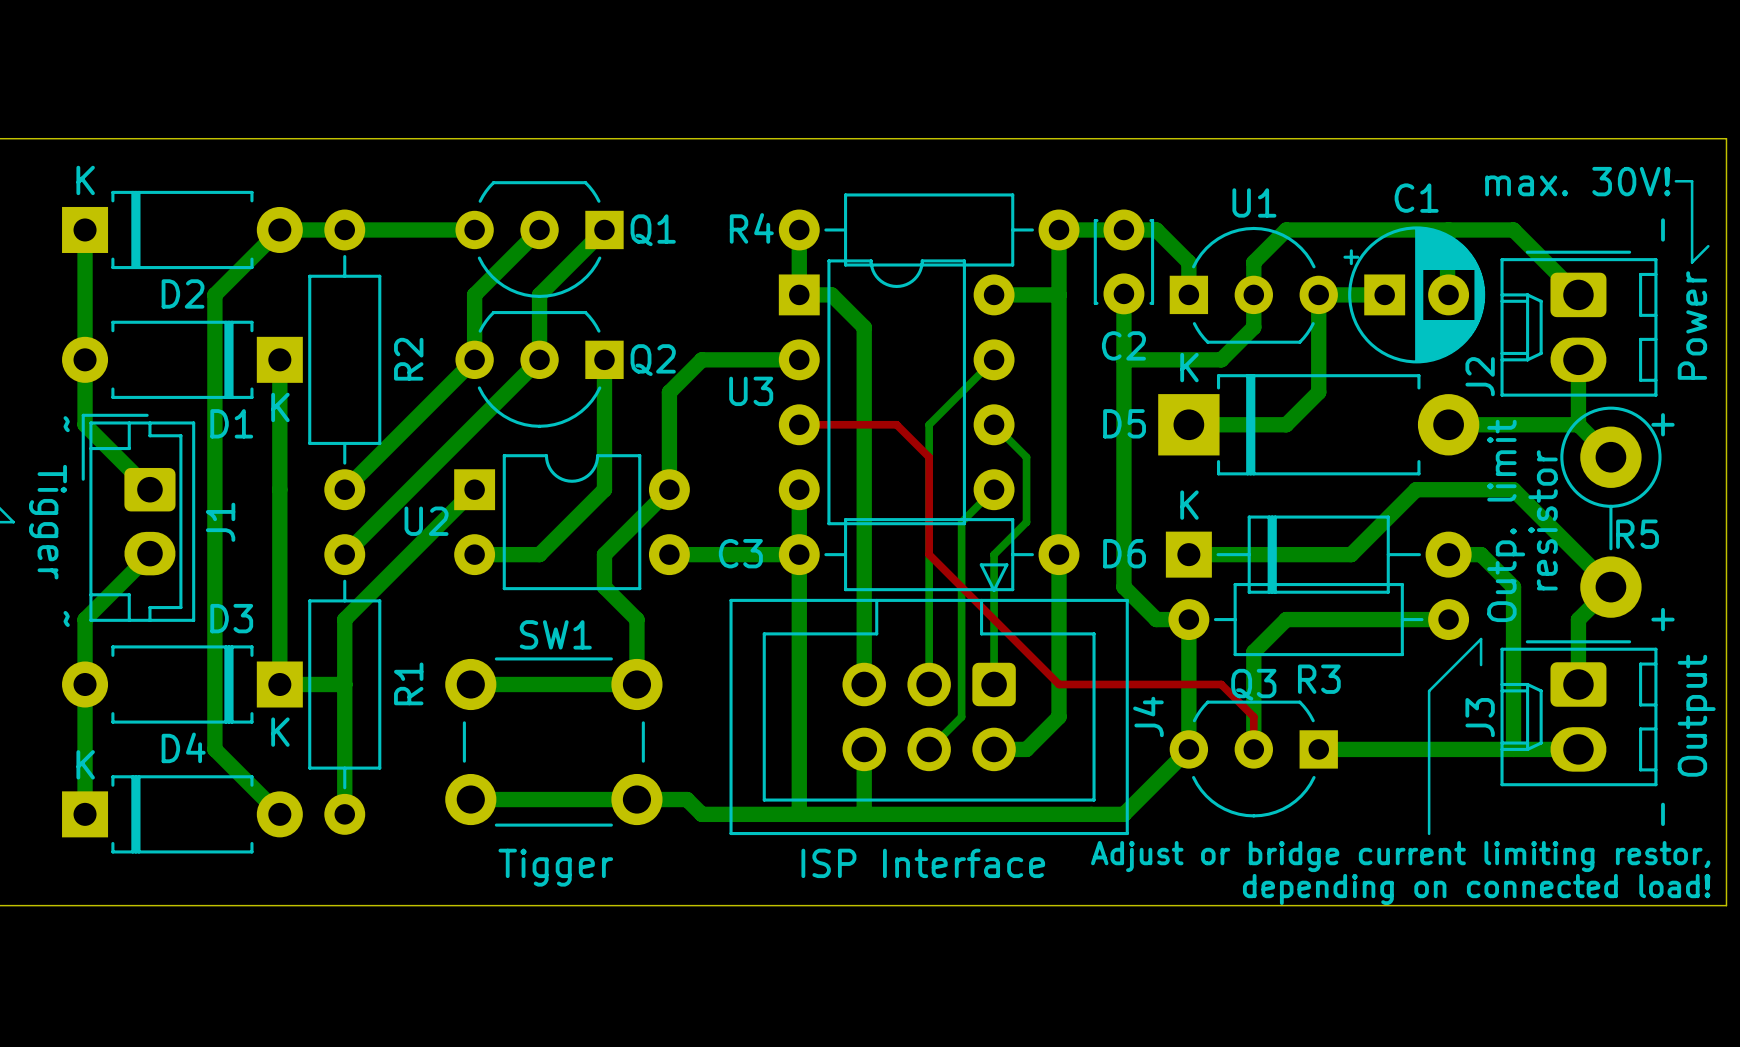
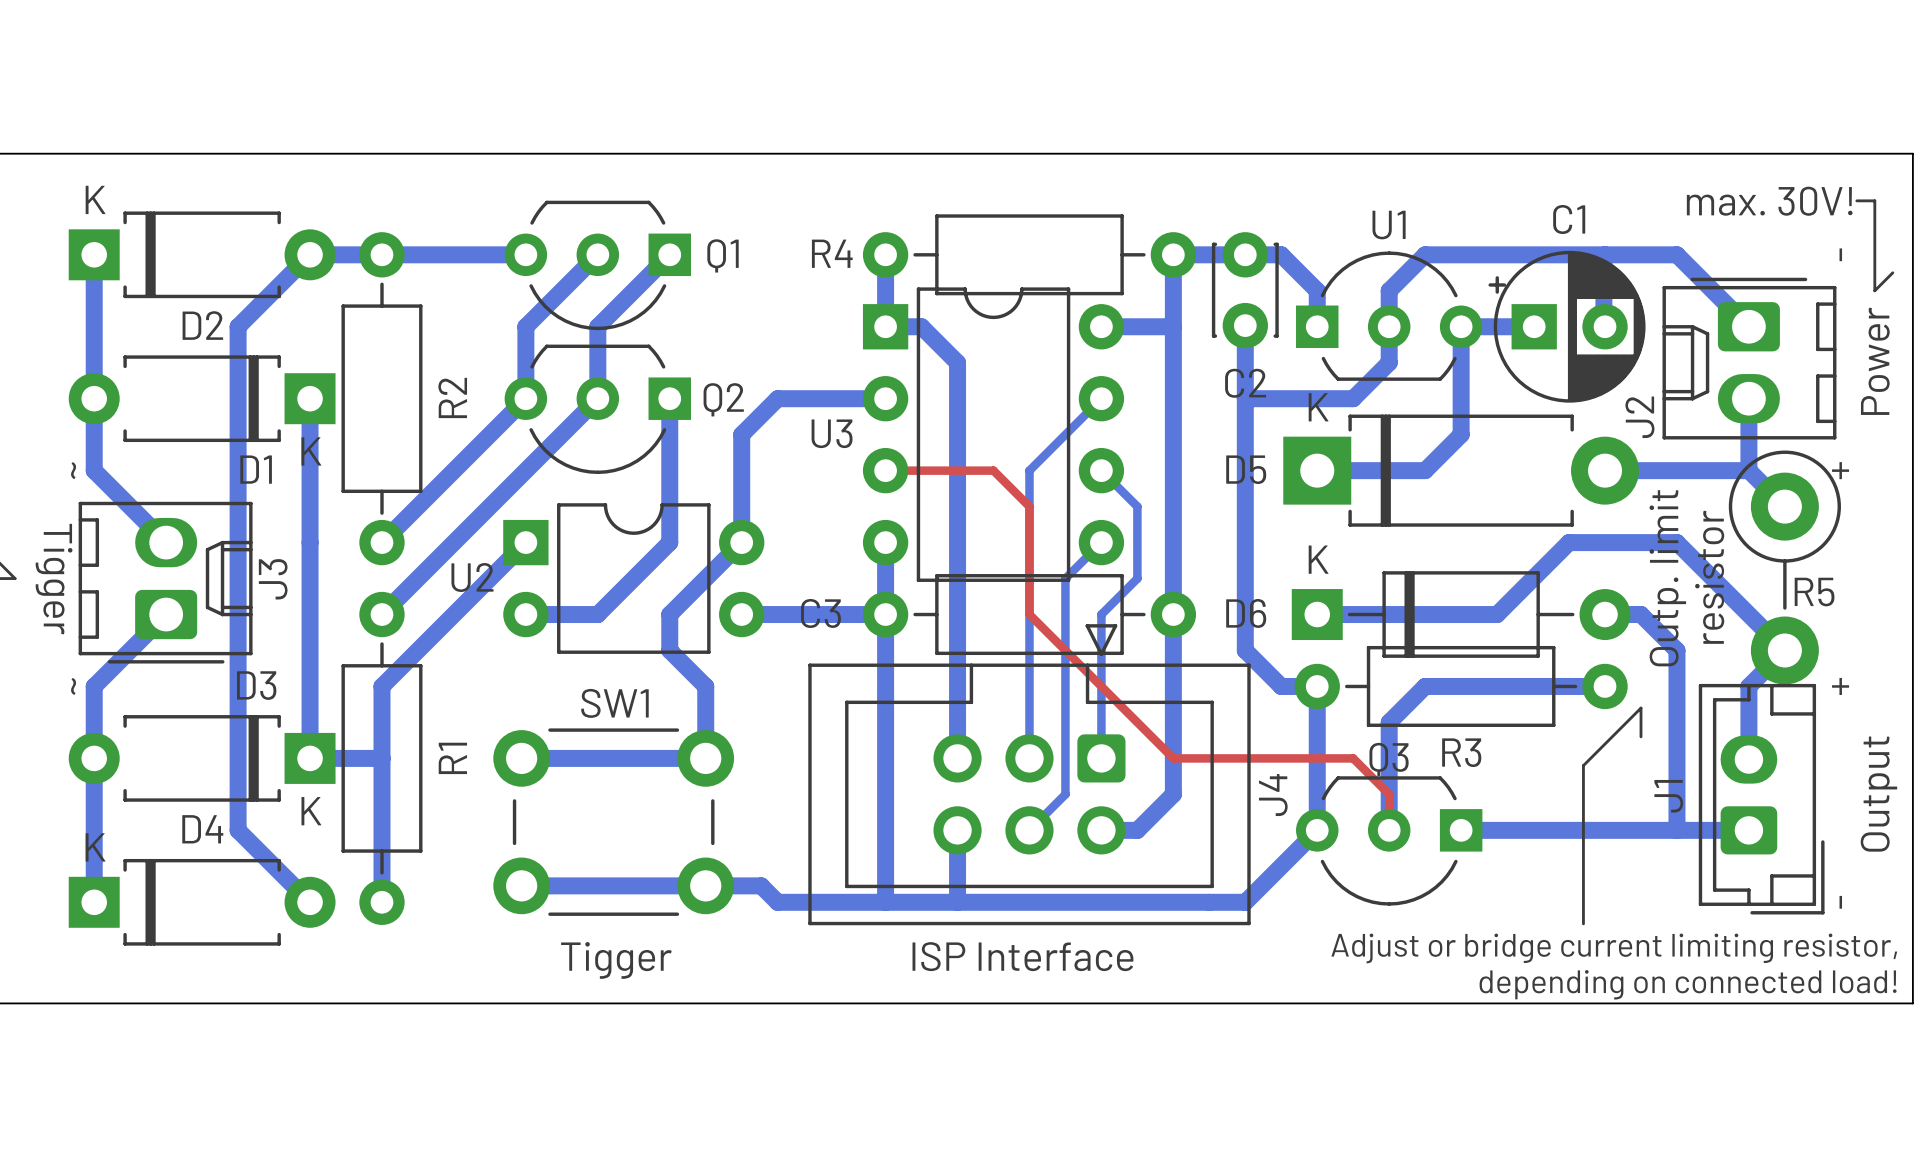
J1 rotation: 0° (138, 517) -> 180° (1761, 799)
J1 position: (138, 517) -> (1761, 799)
J3 rotation: 0° (1578, 713) -> 180° (165, 582)
J3 position: (1578, 713) -> (165, 582)
text: Adjust or bridge current limiting restor, (1400, 856) -> Adjust or bridge current limiting resistor, (1614, 948)

